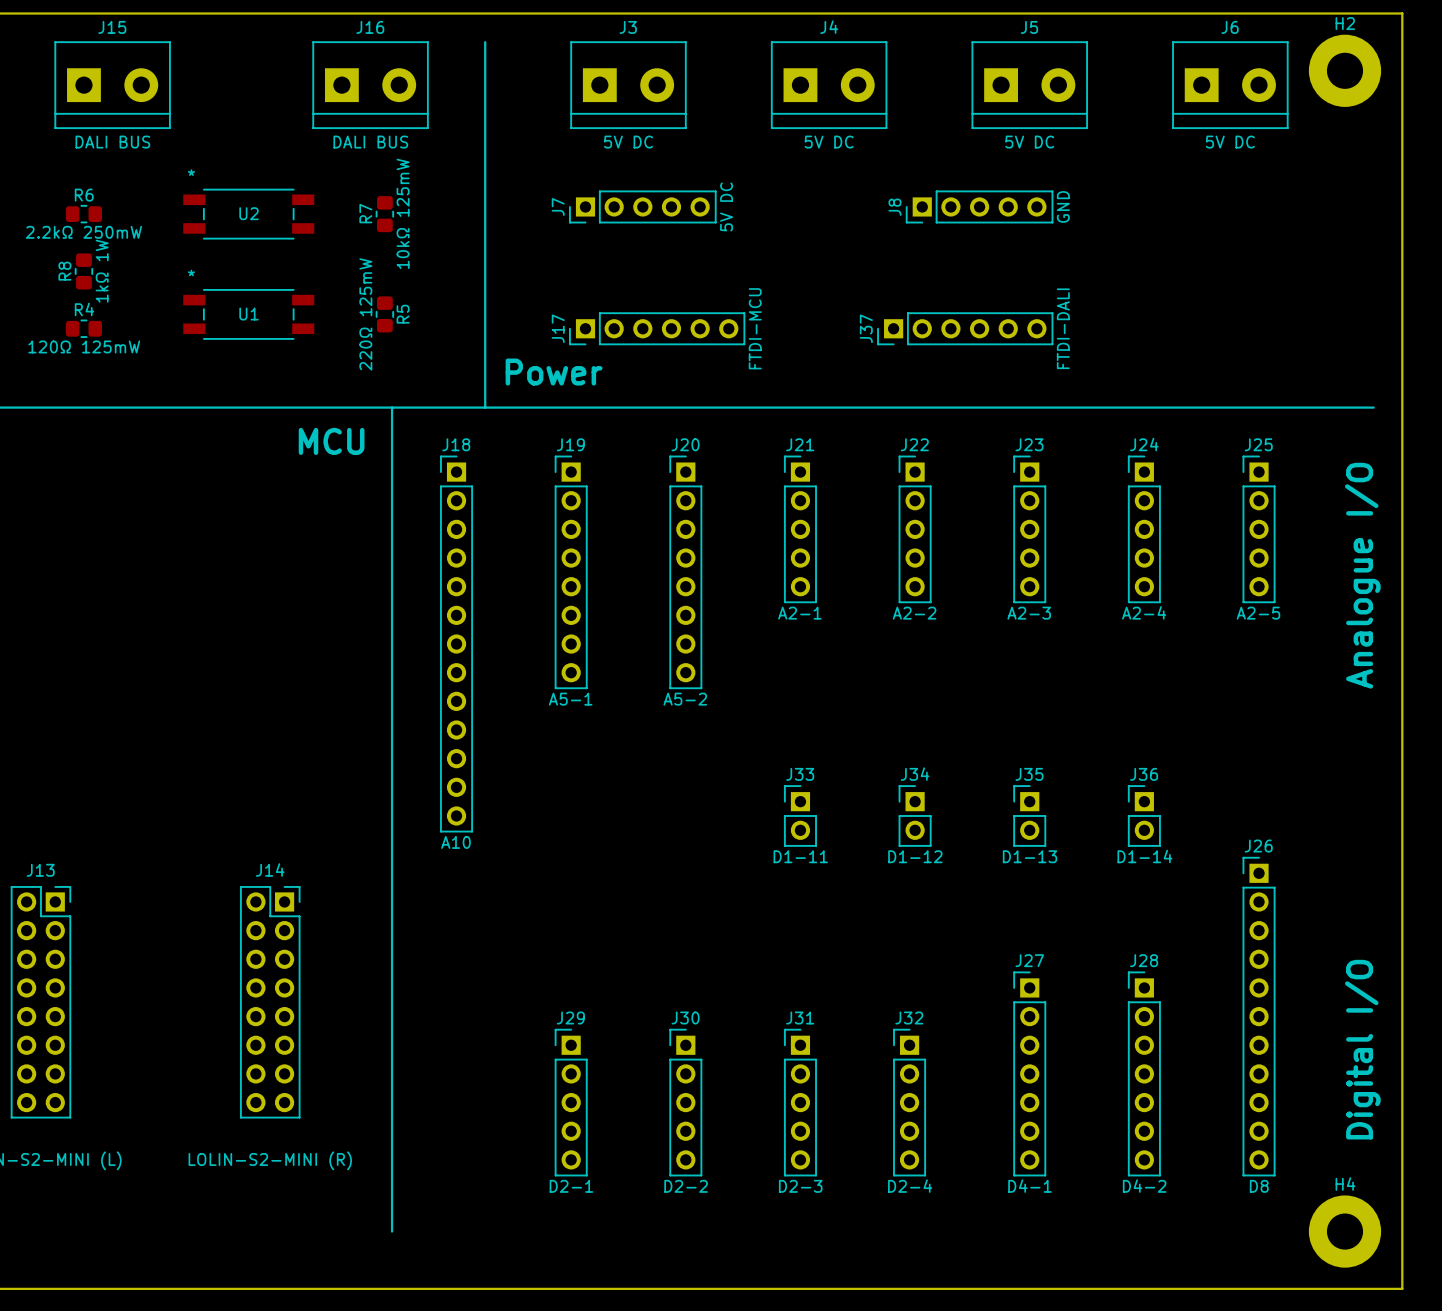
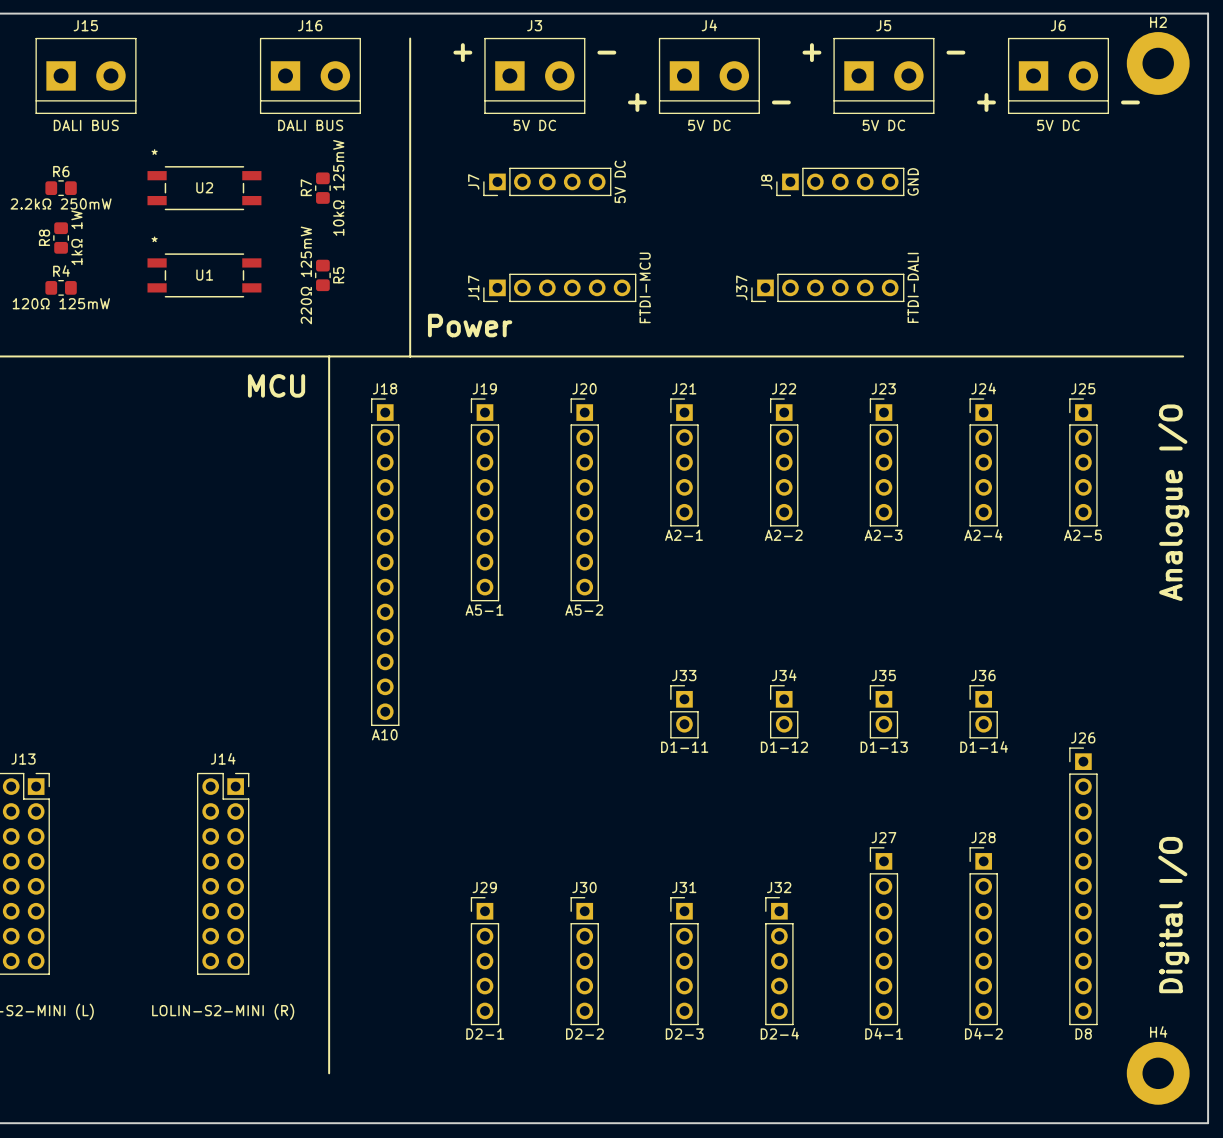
text: none -> + - (534, 52)
text: none -> + - (883, 52)
text: none -> + - (709, 102)
text: none -> + - (1058, 102)

